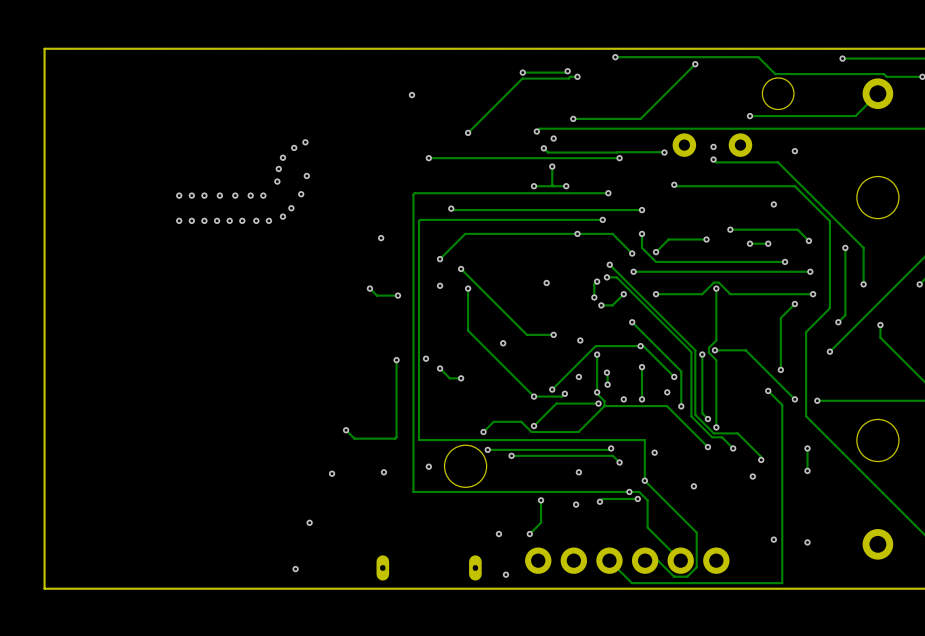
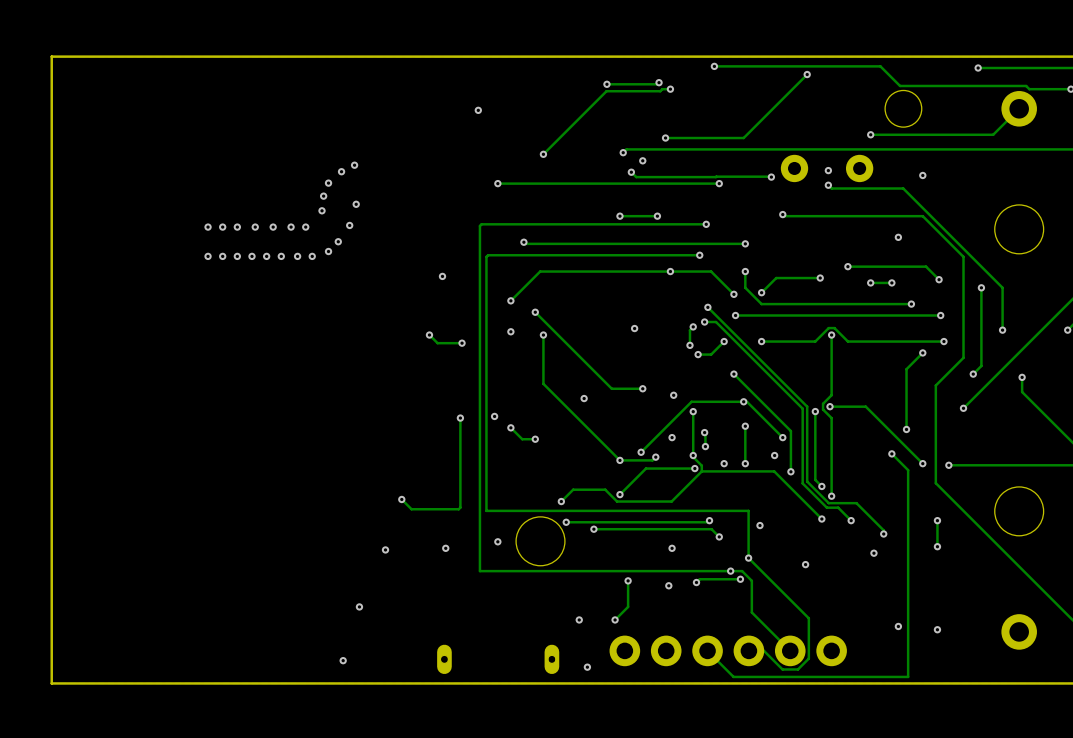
track: (552, 166) (553, 186) -> none
via: (552, 166) -> none

